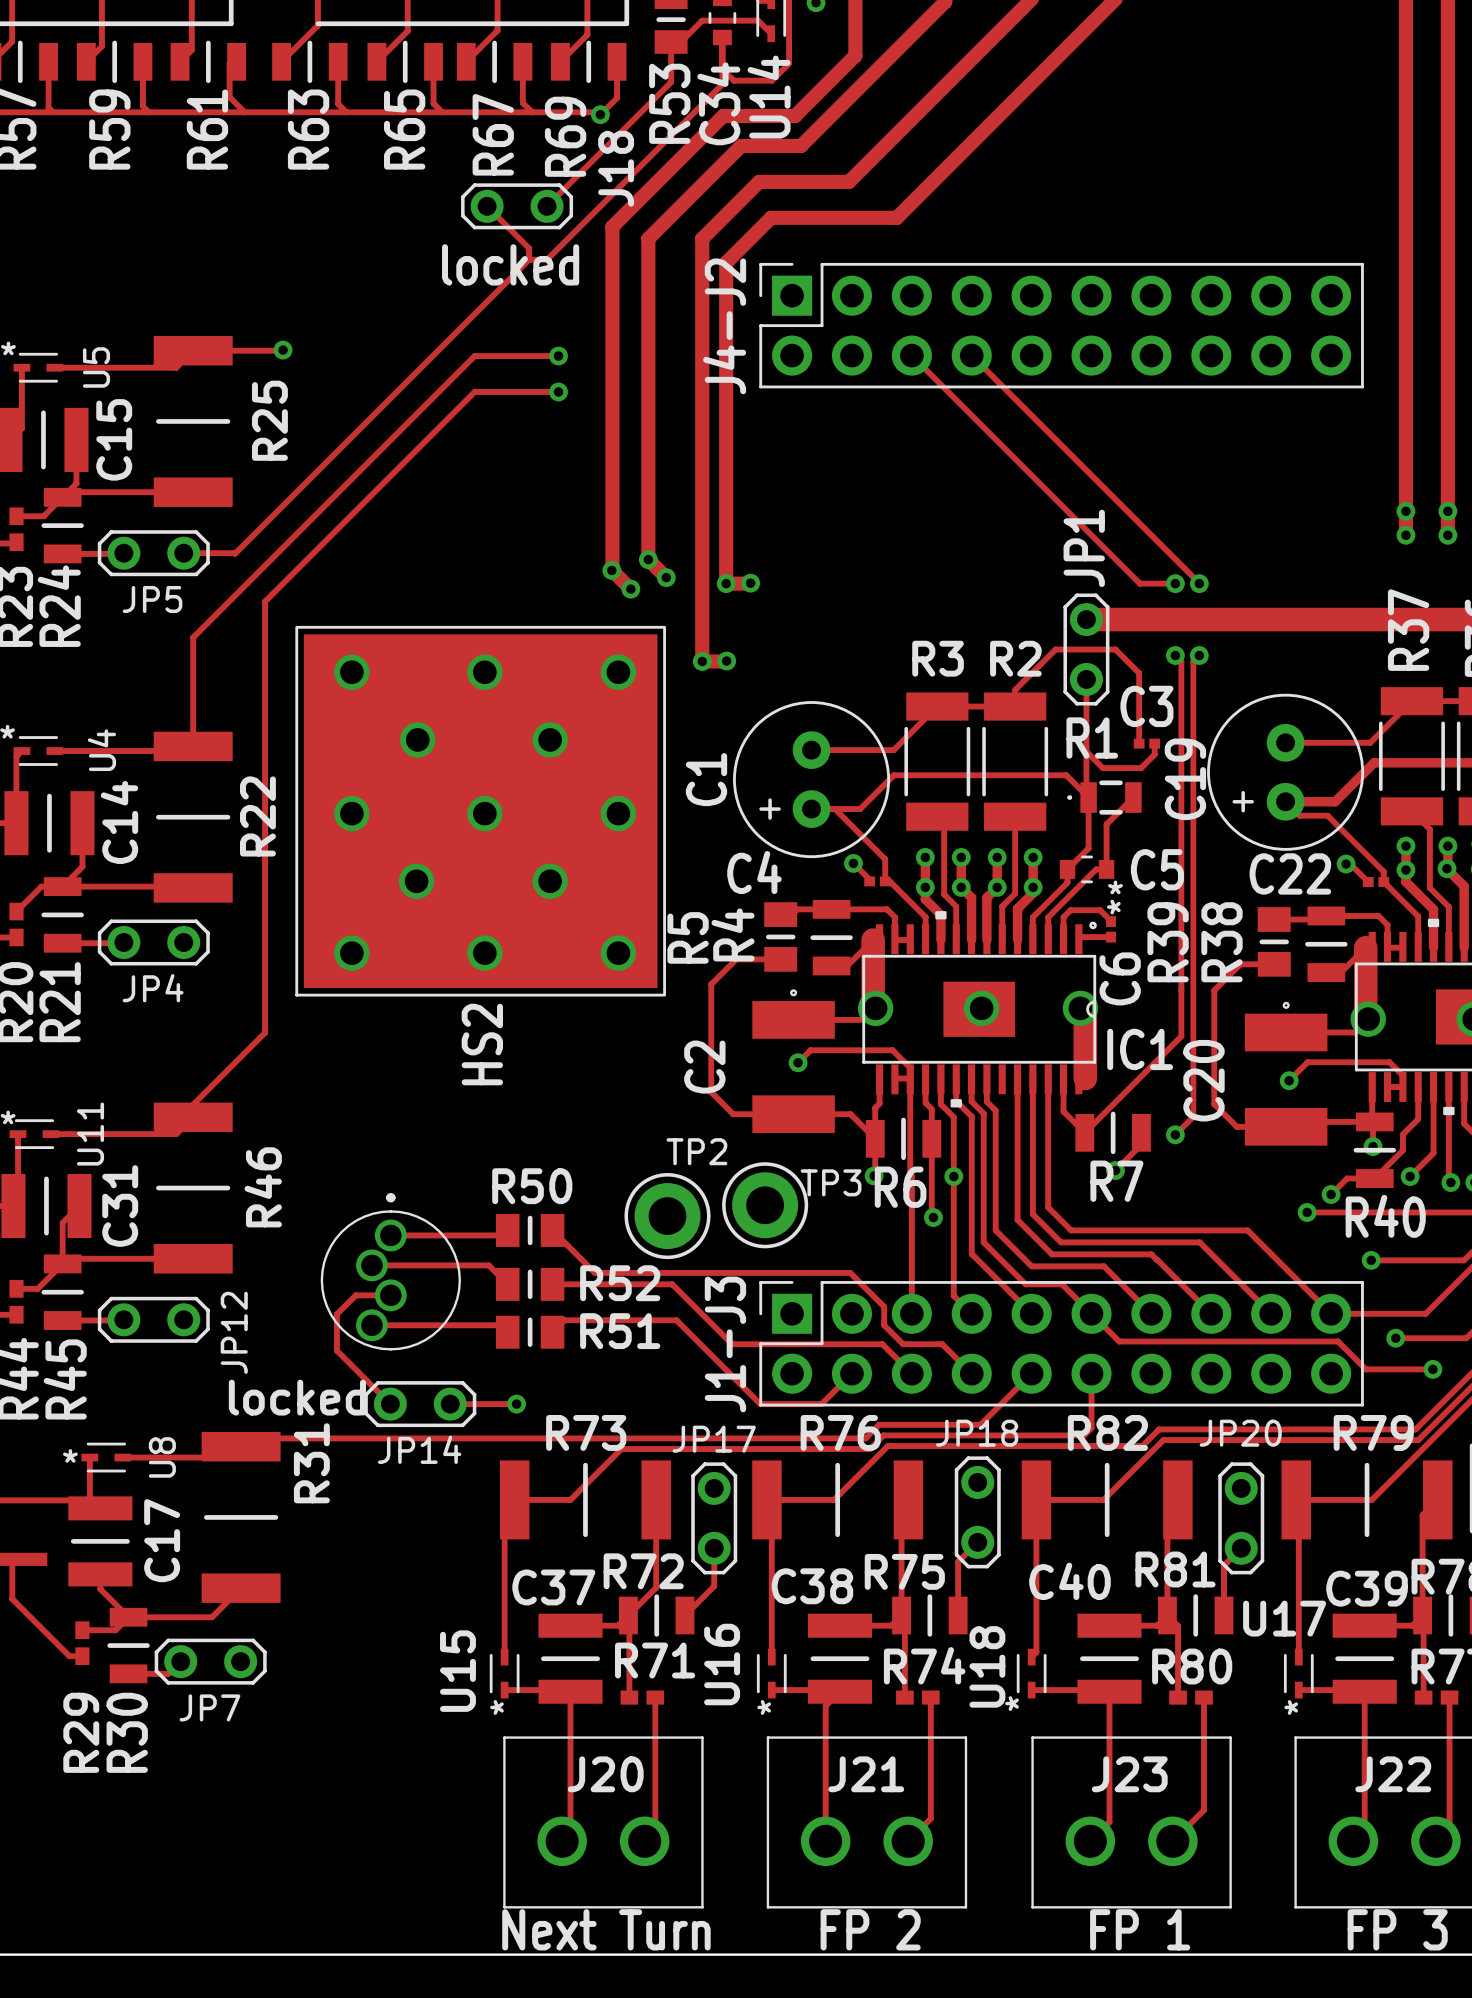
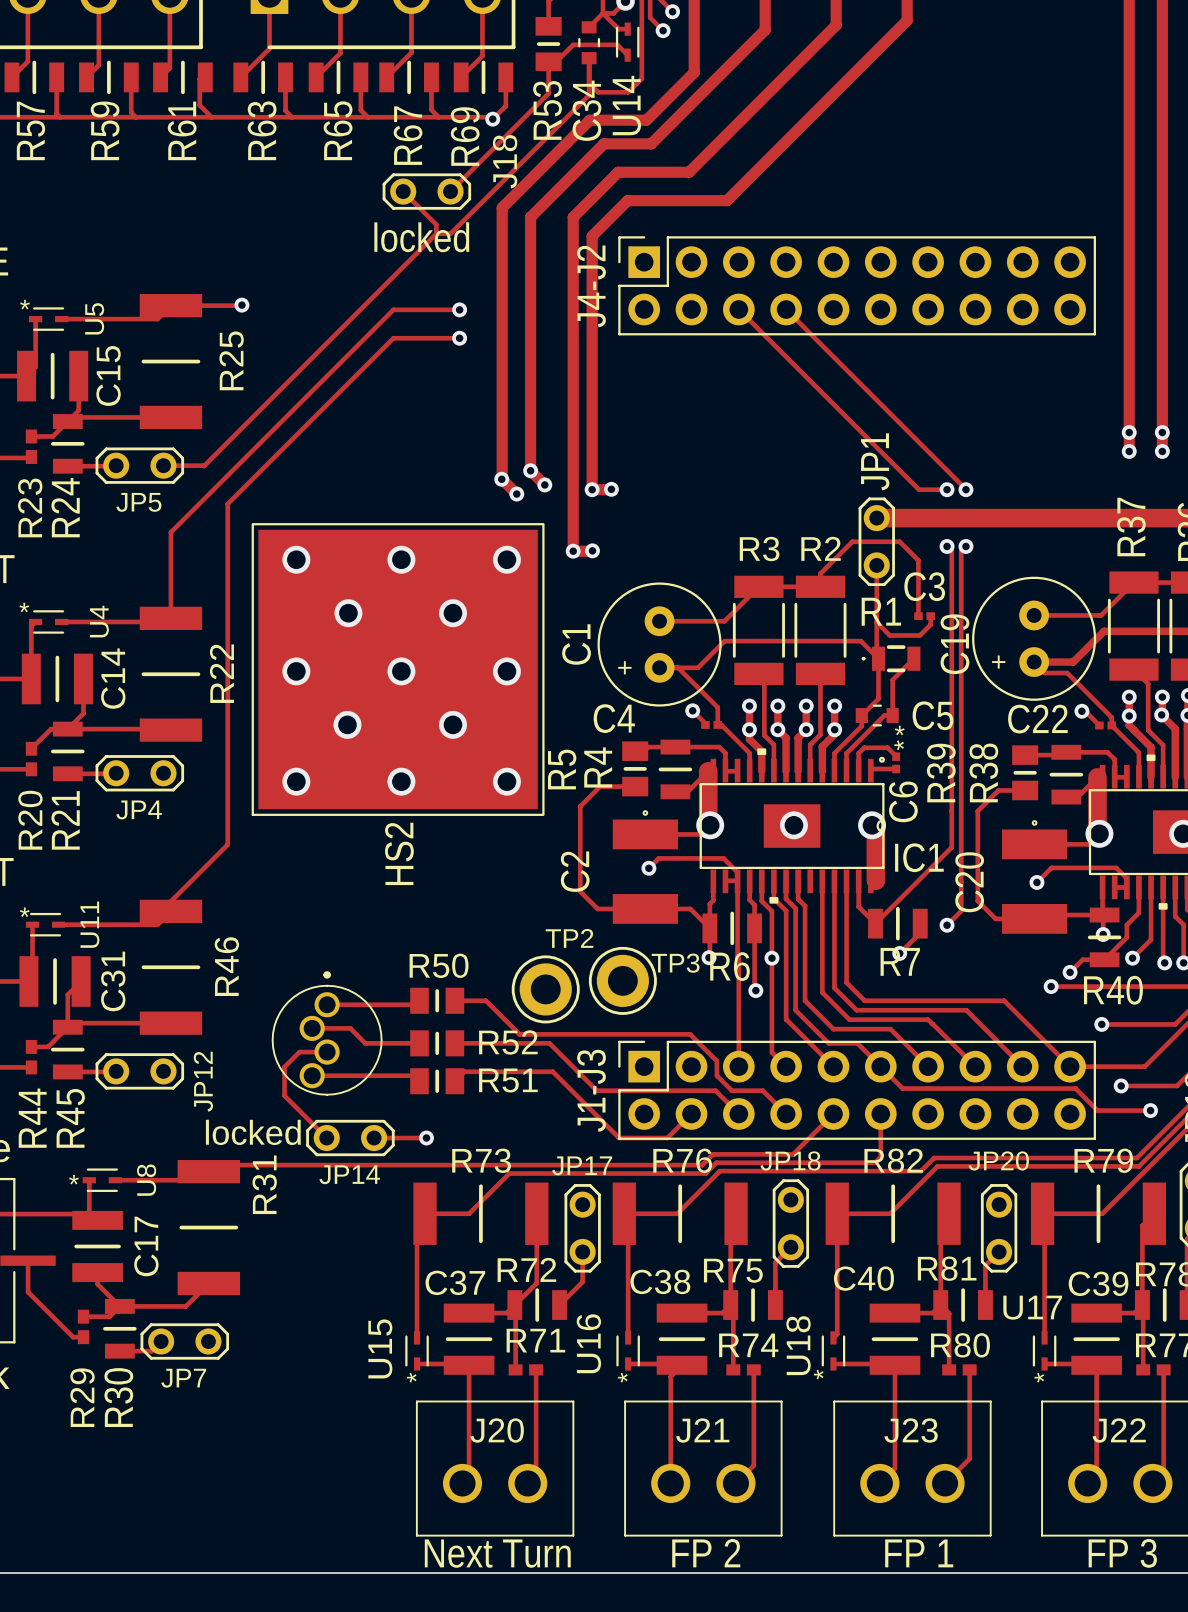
track: (552, 1230) (595, 1272) (634, 1272) -> (454, 1000) (486, 1000) (519, 1034)
track: (420, 1265) (488, 1265) (507, 1284) -> (350, 1028) (365, 1043) (419, 1043)

